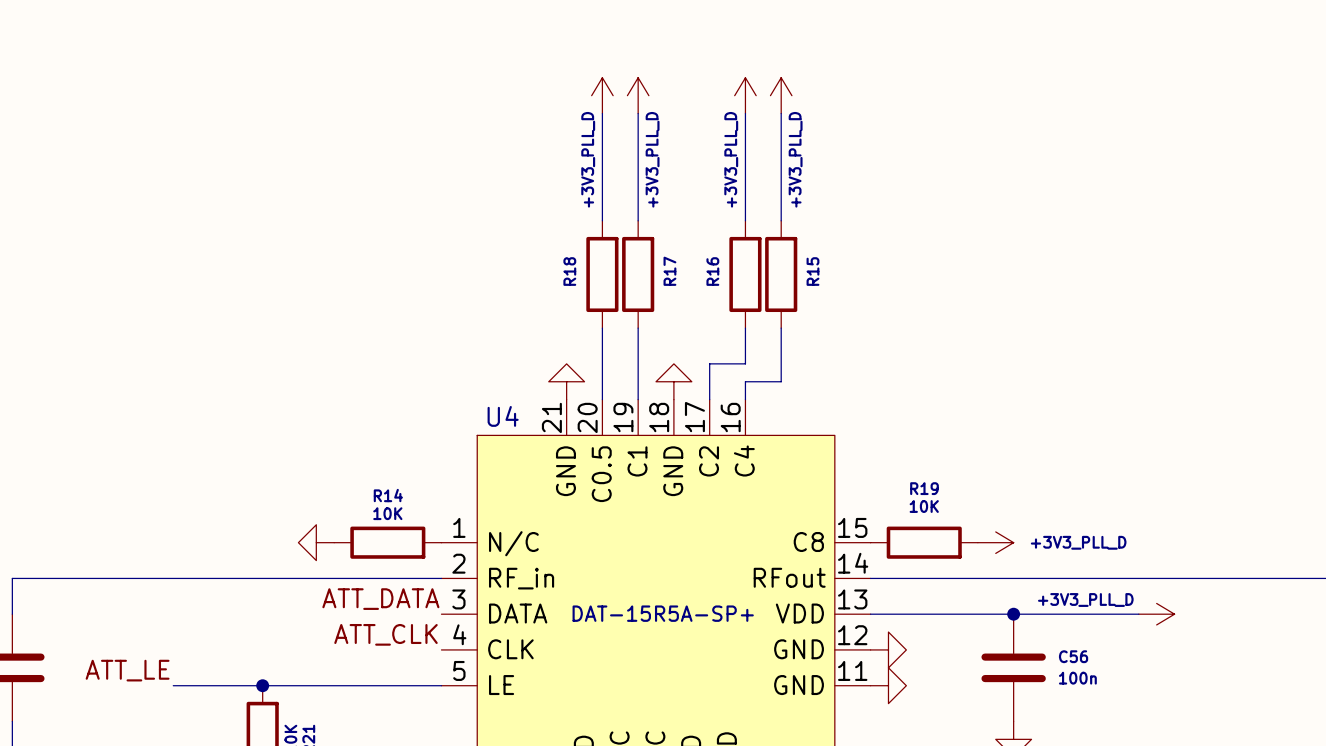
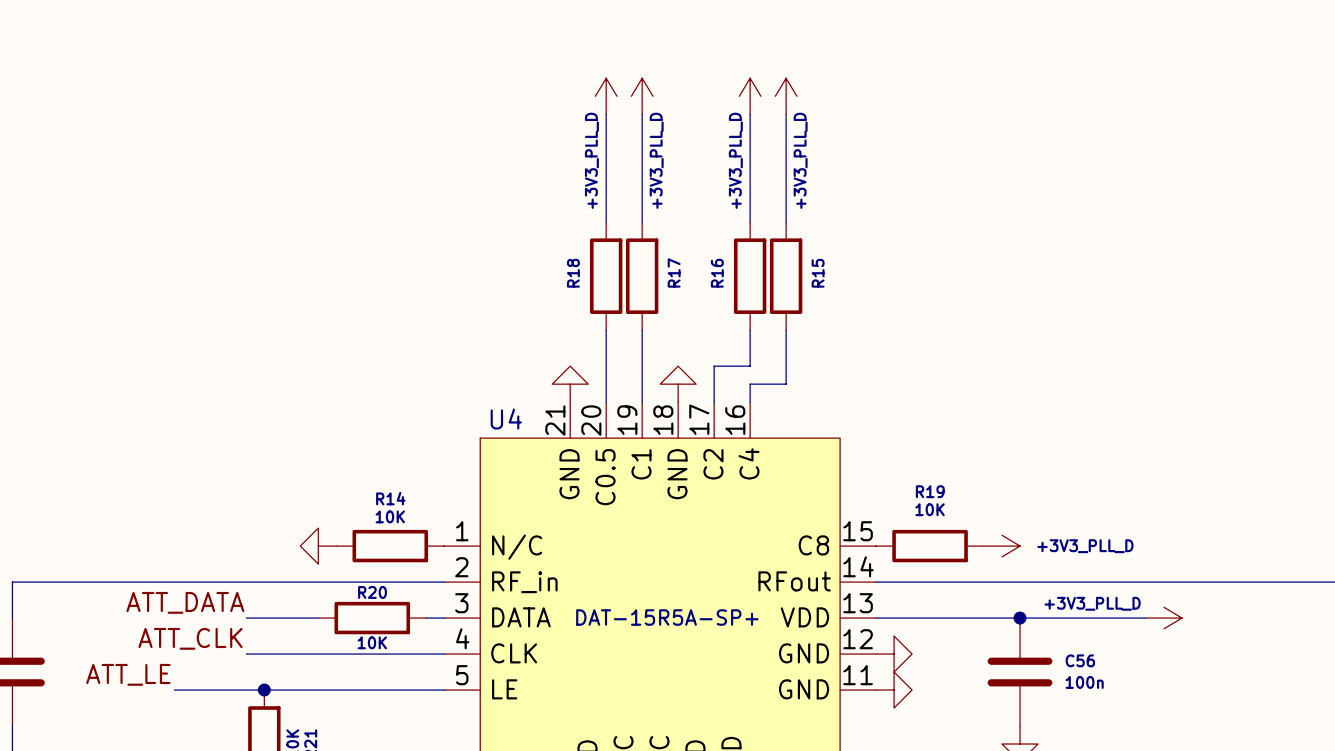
label position: ATT_DATA (380, 599) -> ATT_DATA (185, 602)
wire: none -> (246, 618) (318, 618)
R20: none -> 10K (372, 618)
wire: none -> (426, 618) (444, 618)
label position: ATT_CLK (386, 634) -> ATT_CLK (190, 638)
wire: none -> (246, 654) (444, 654)

